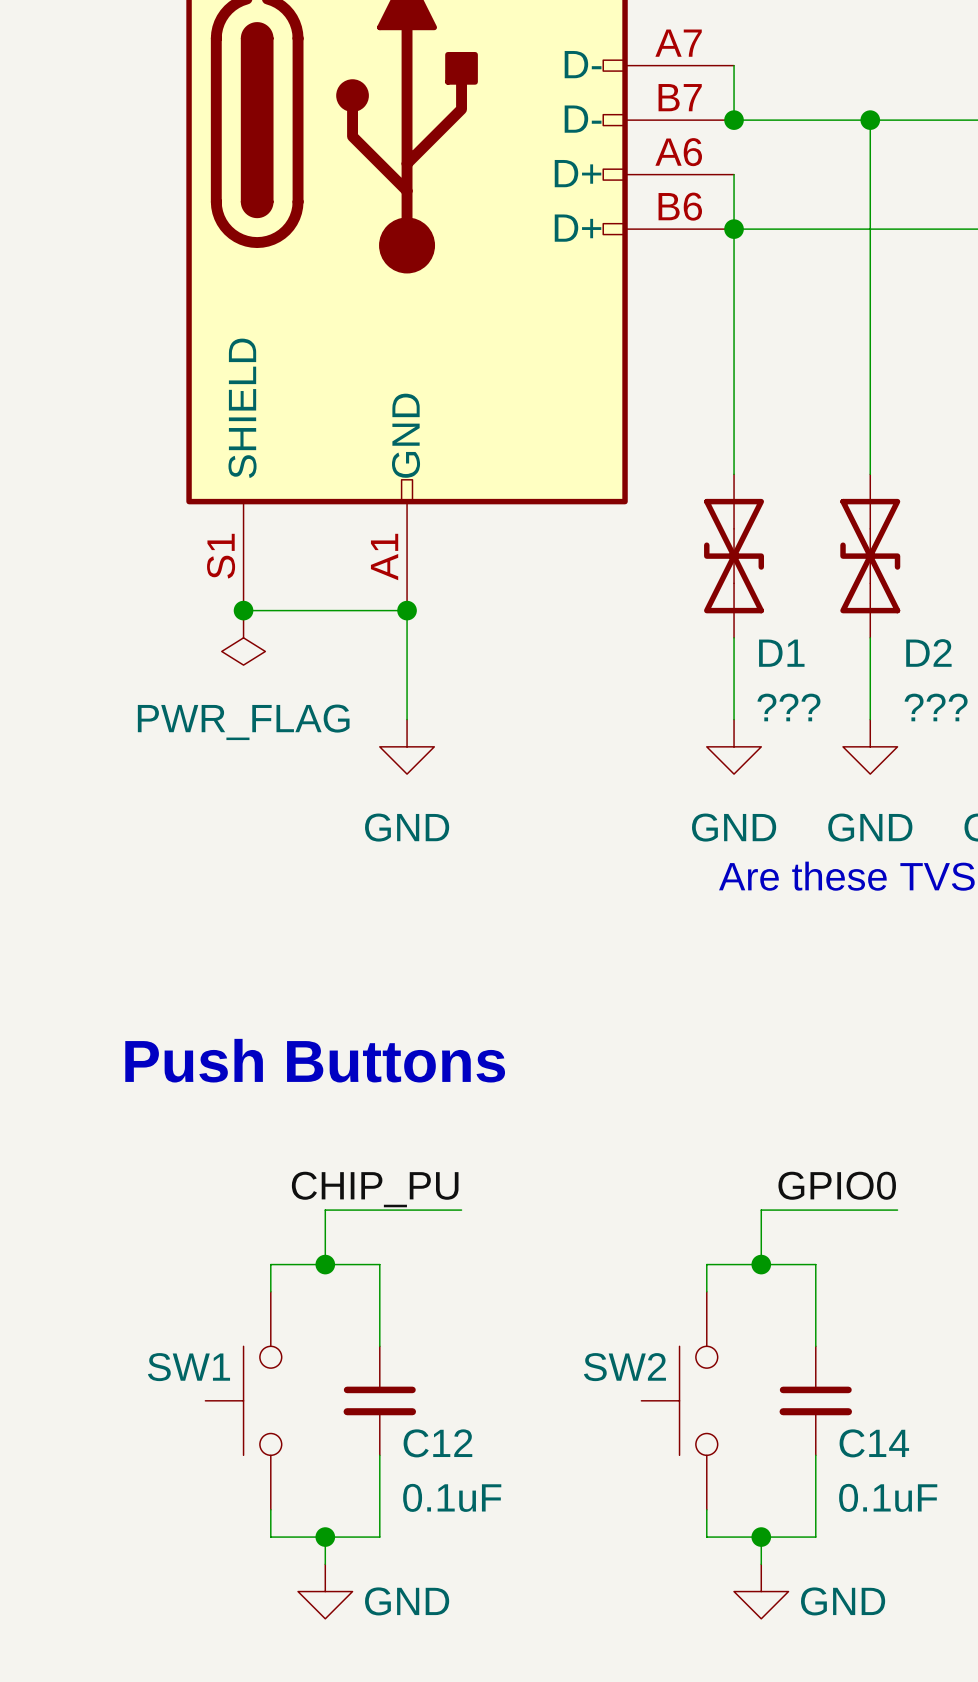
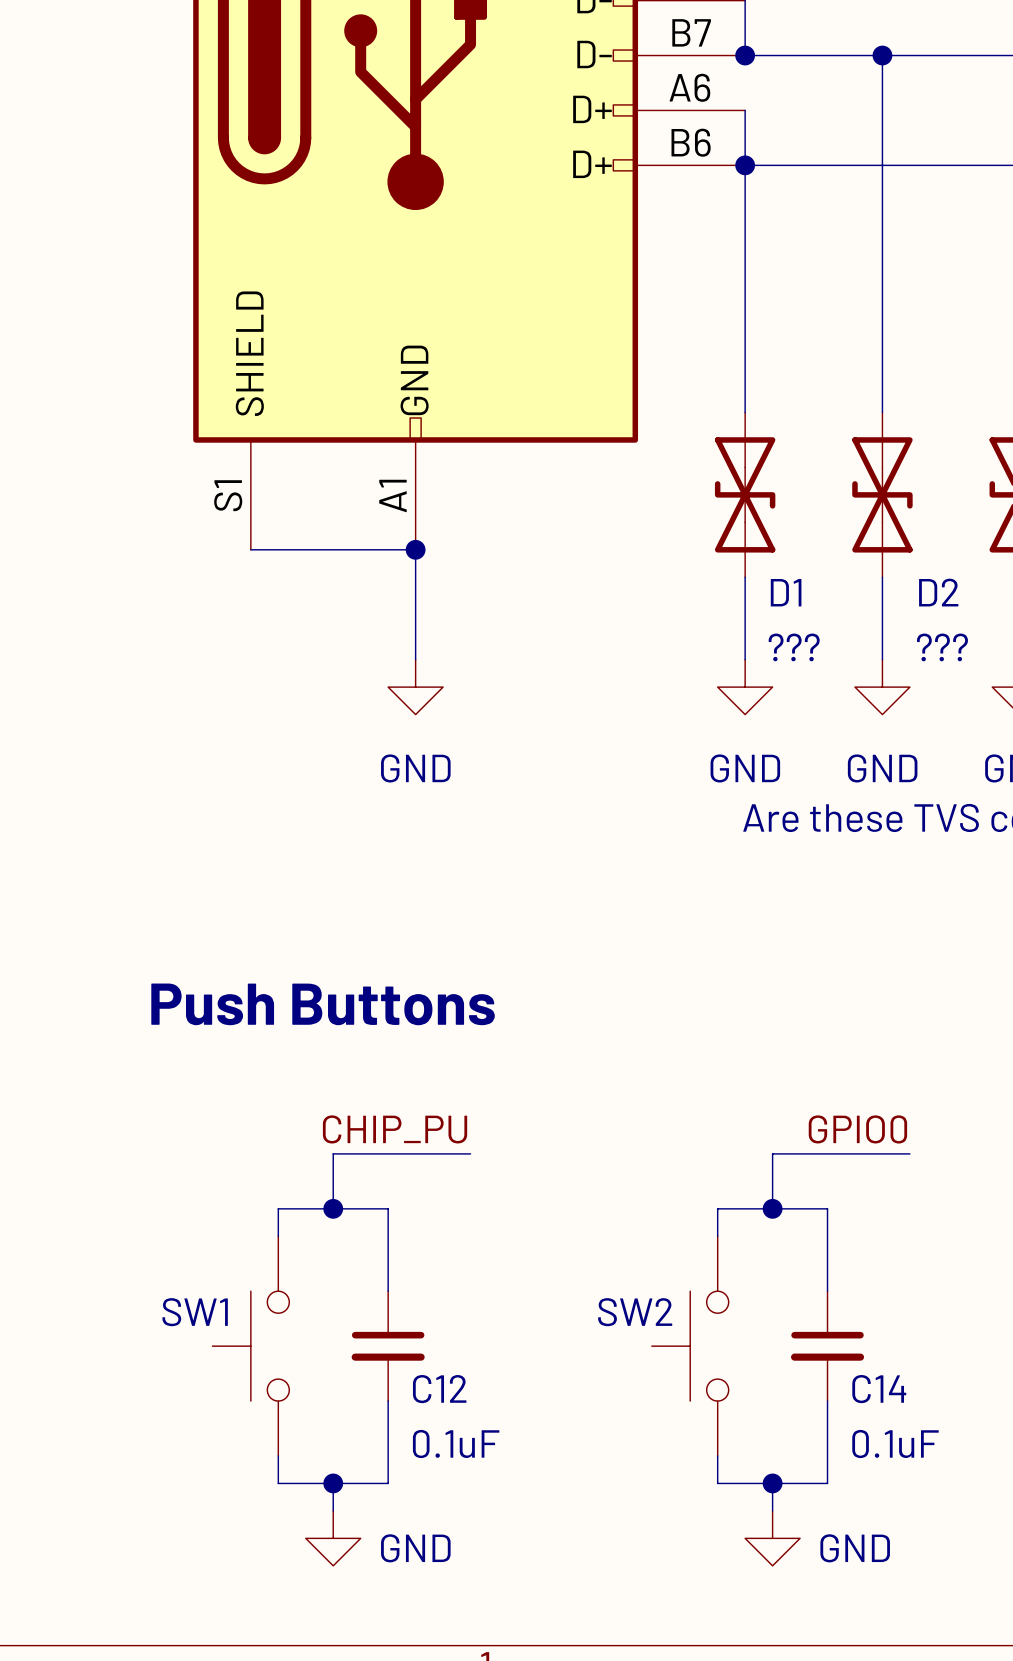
junction: (243, 610) -> none
power symbol: PWR_FLAG (243, 637) -> none

